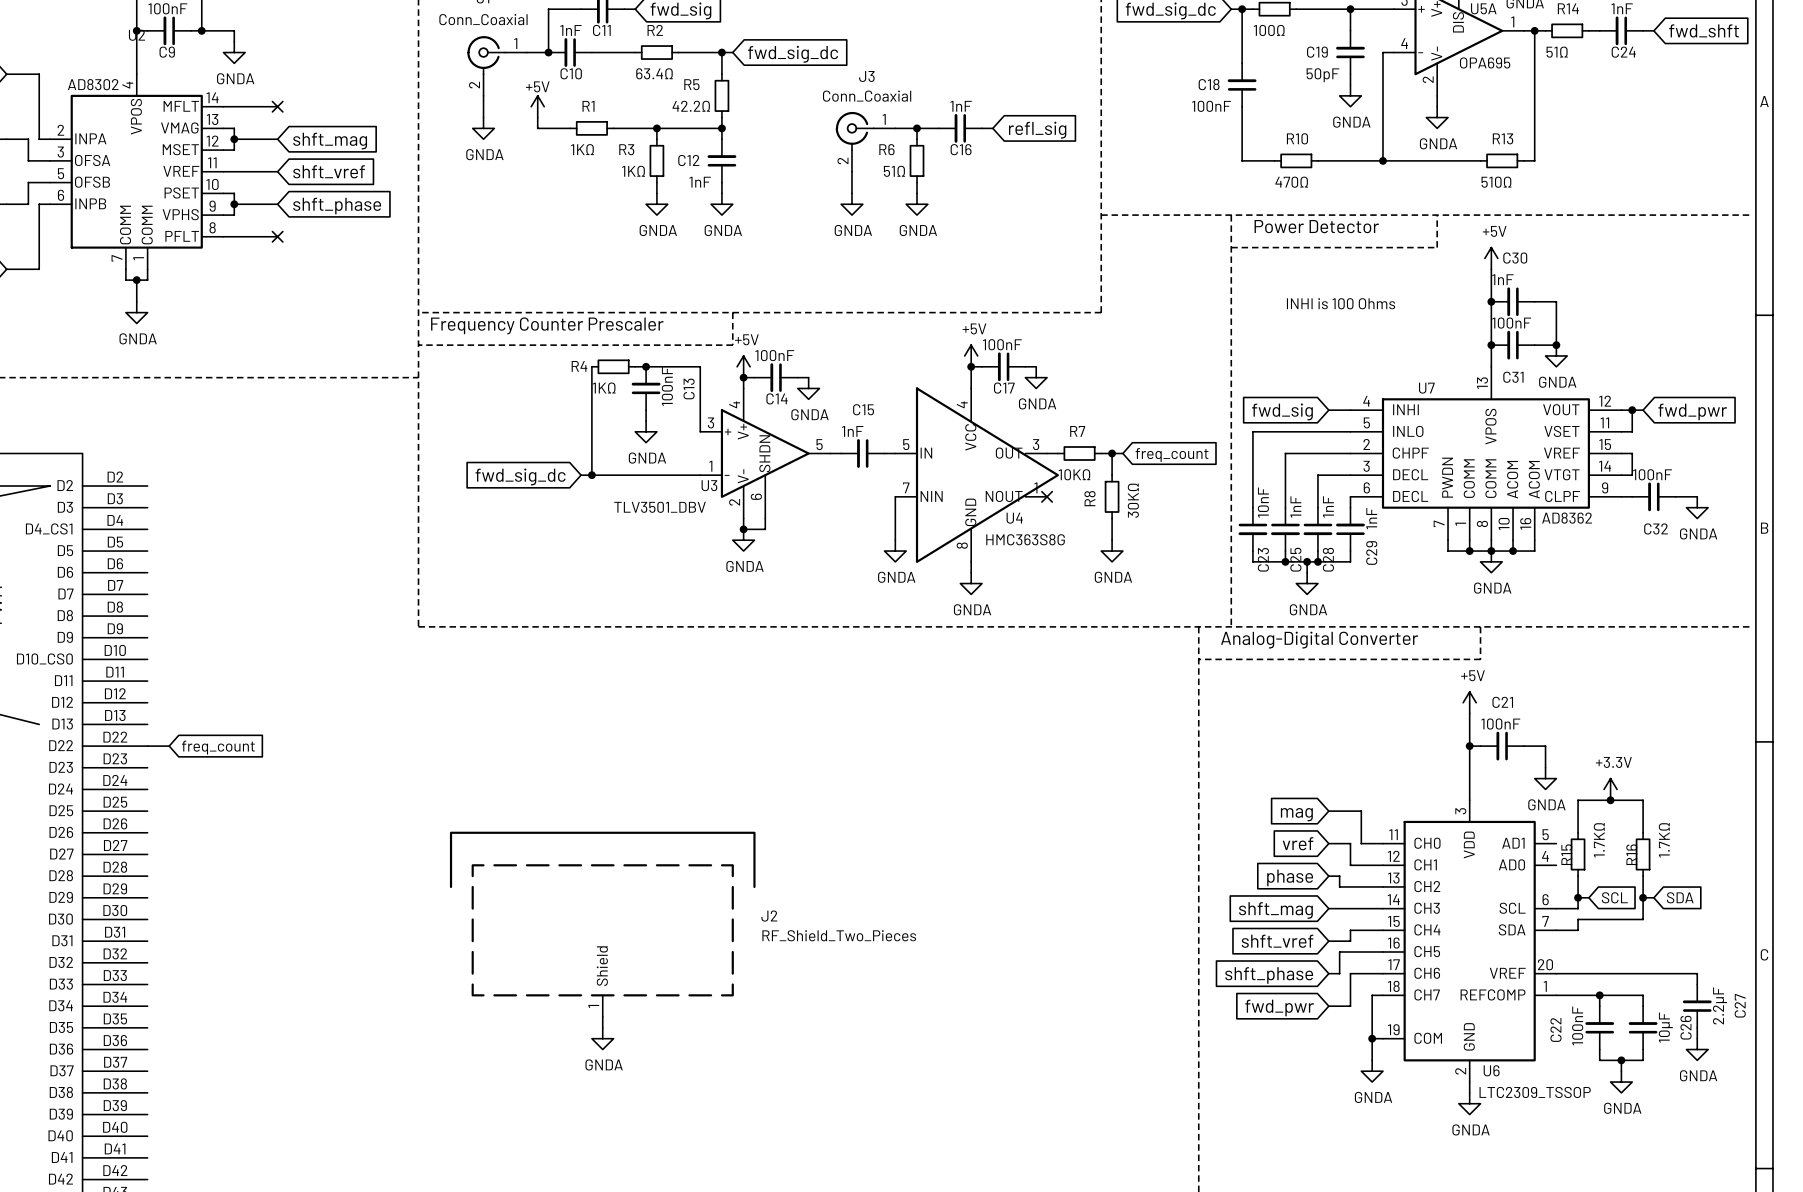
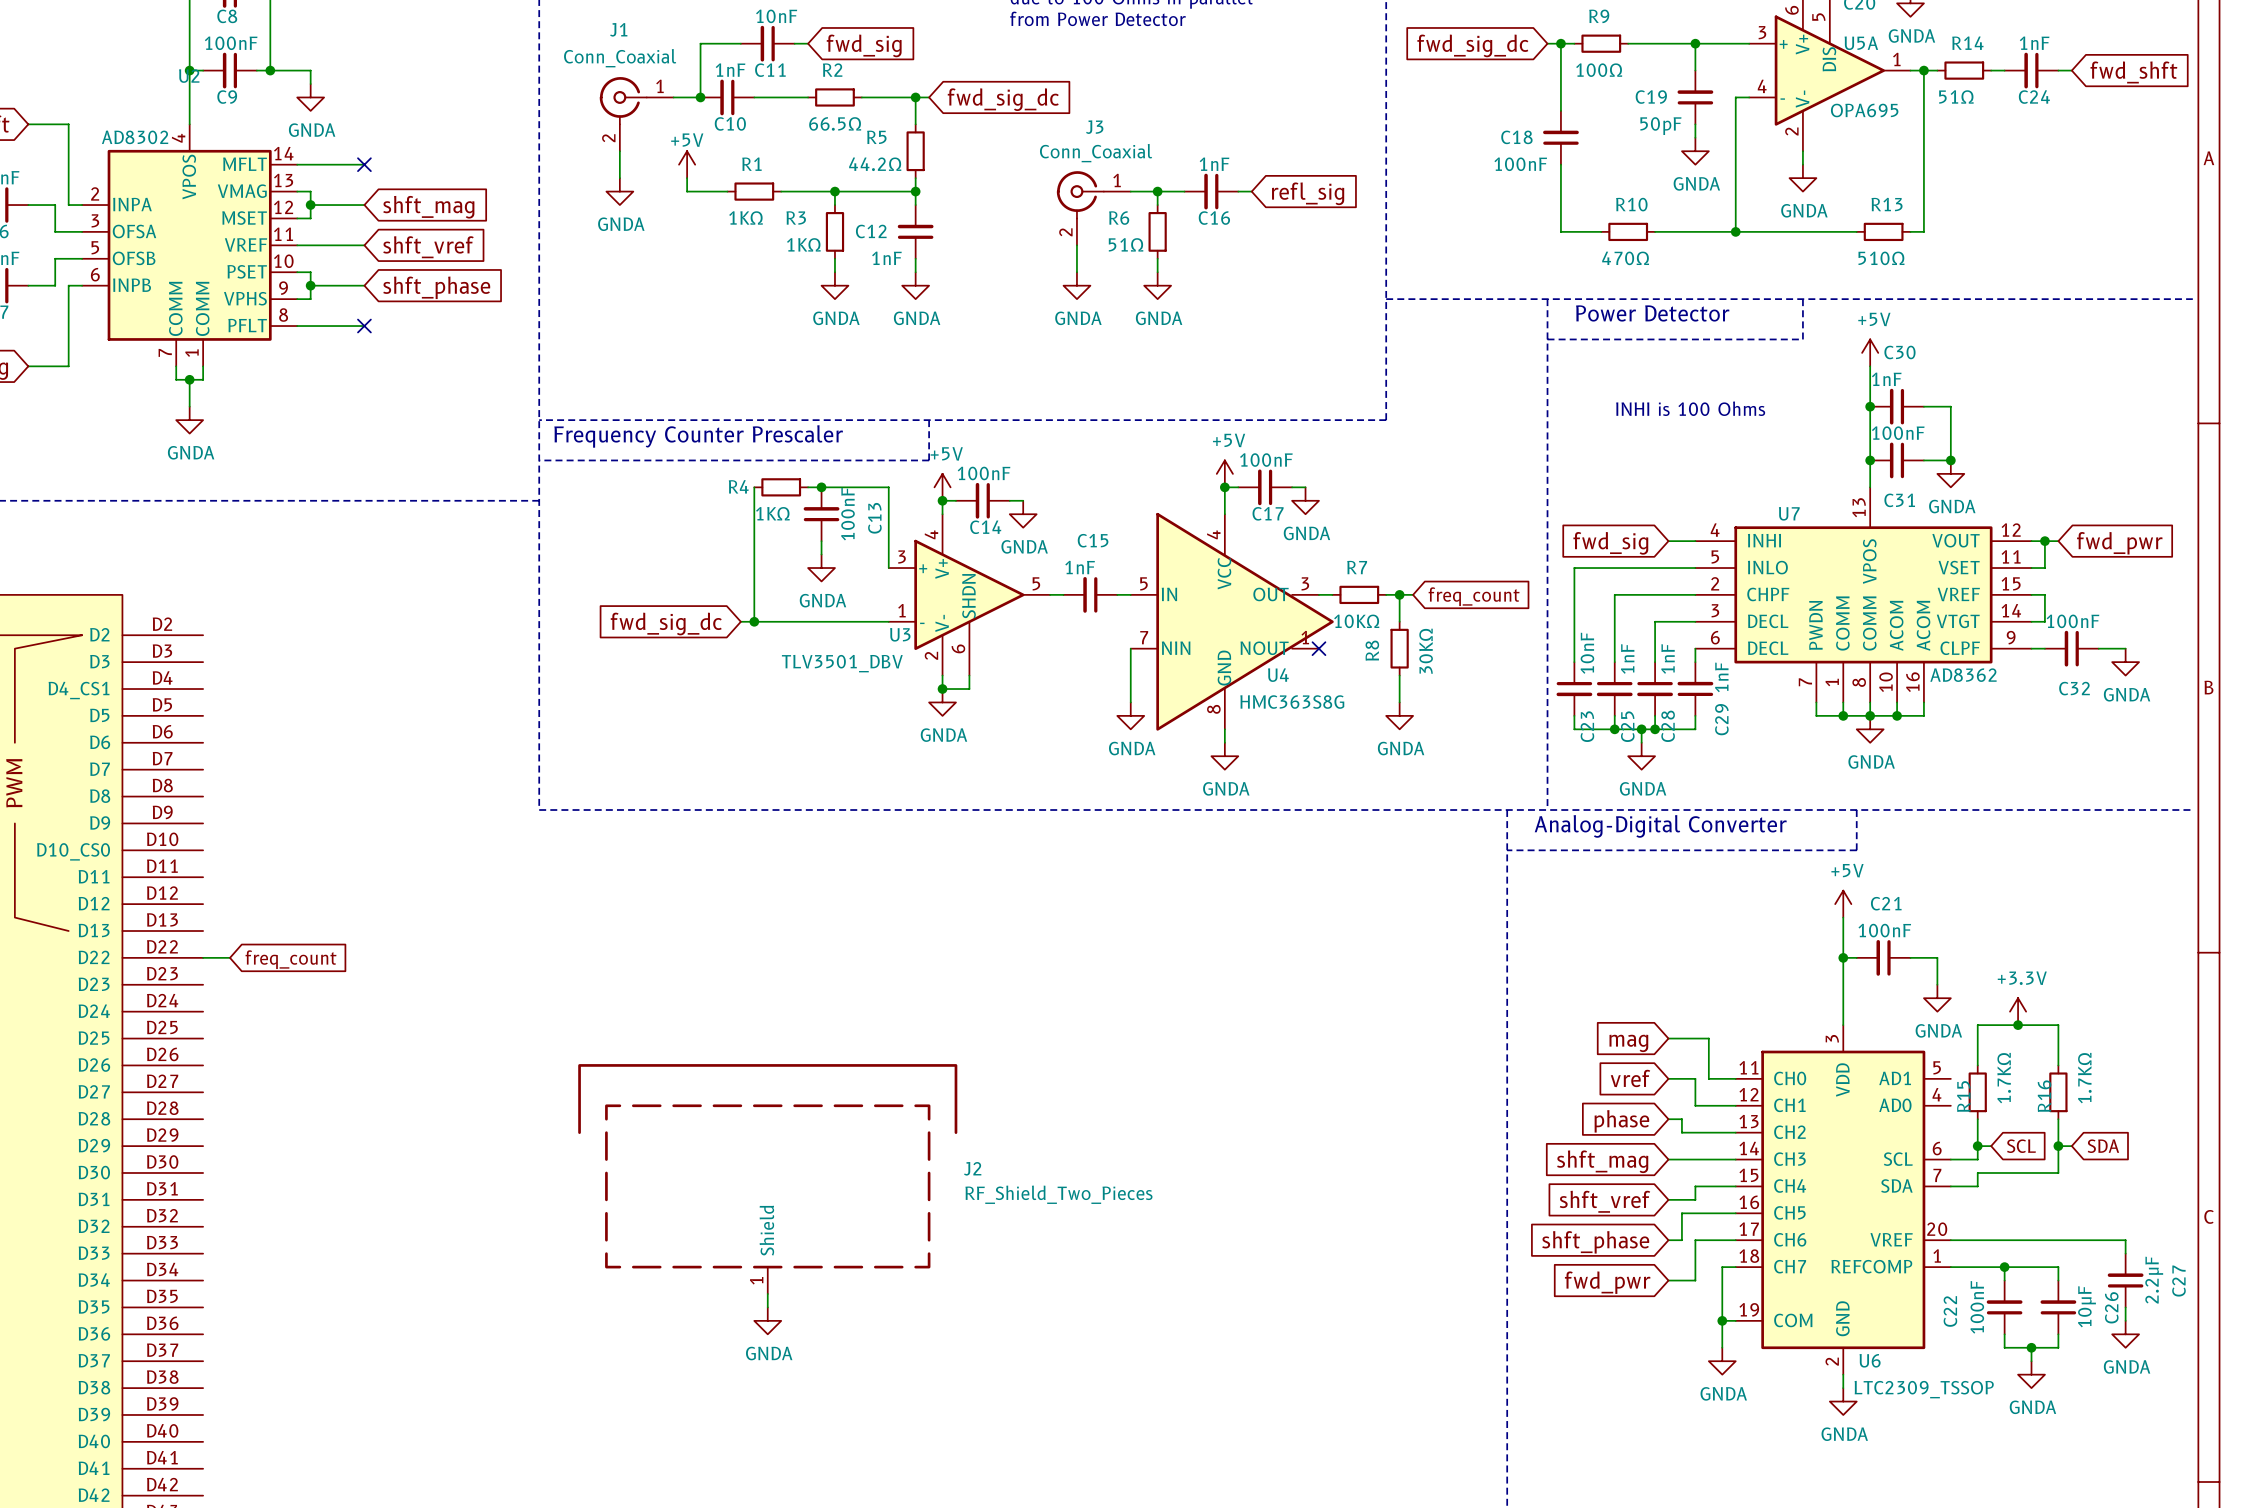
R2 value: 63.4Ω (654, 73) -> 66.5Ω (835, 123)
R5 value: 42.2Ω (691, 106) -> 44.2Ω (875, 164)

